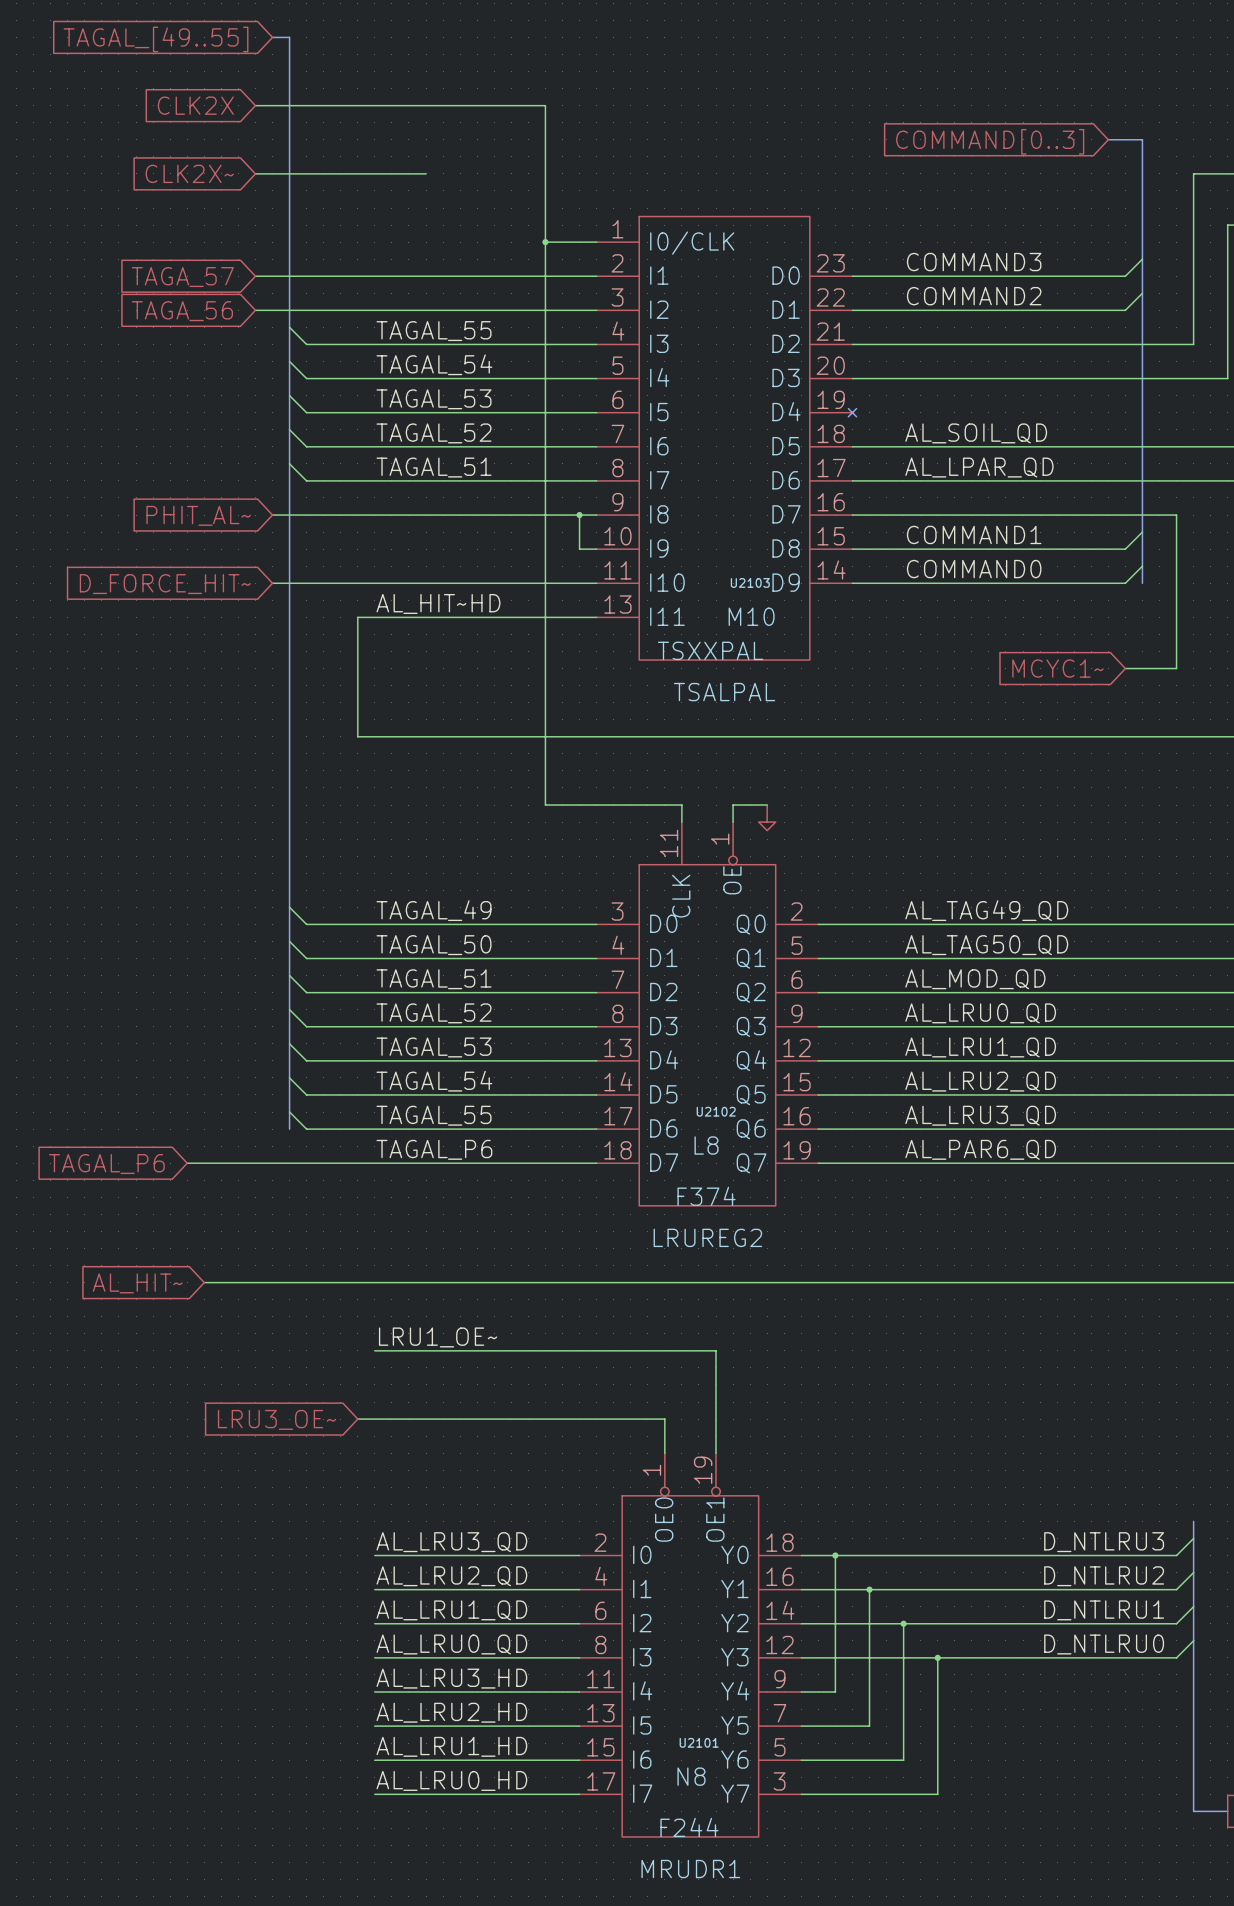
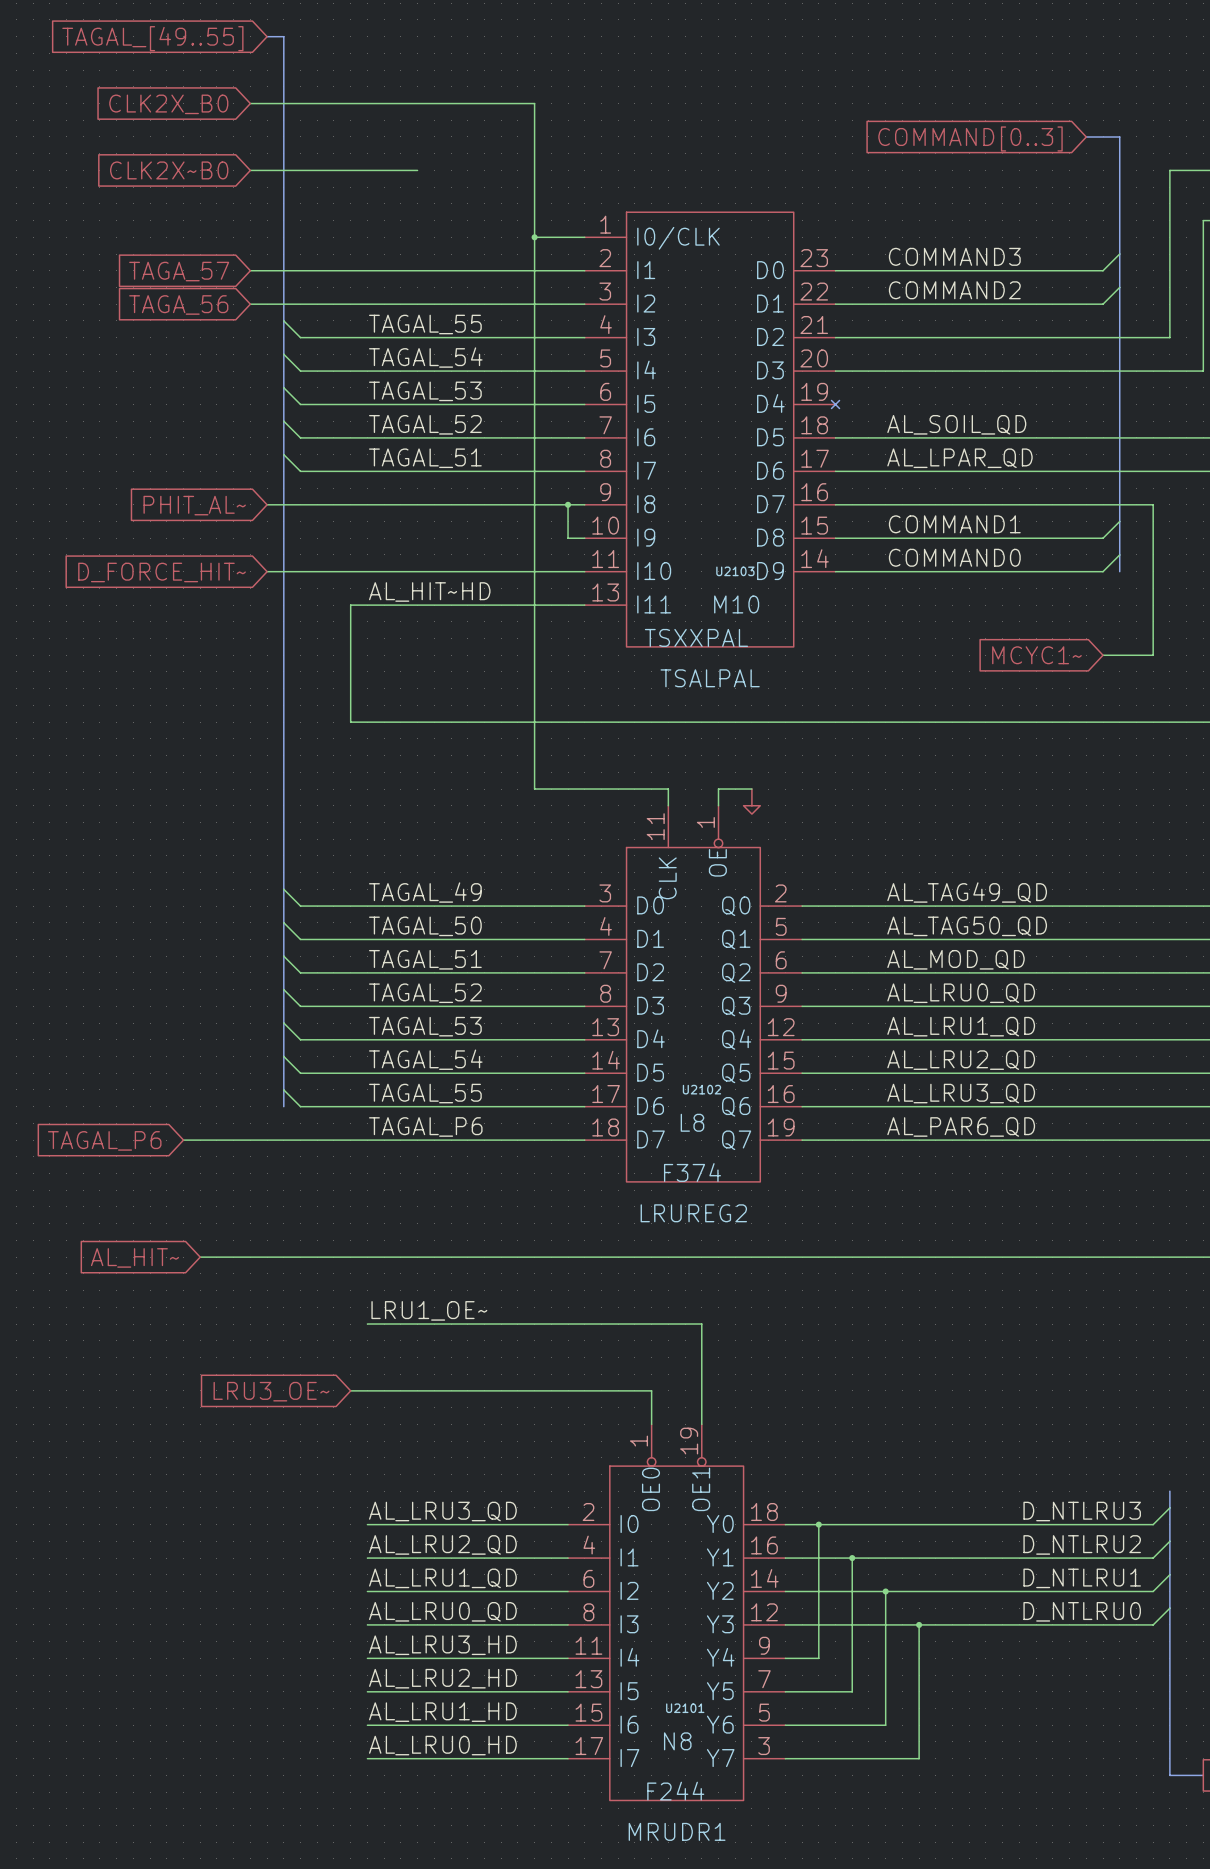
global label: CLK2X (195, 105) -> CLK2X_B0 (168, 104)
global label: CLK2X~ (189, 173) -> CLK2X~B0 (169, 170)

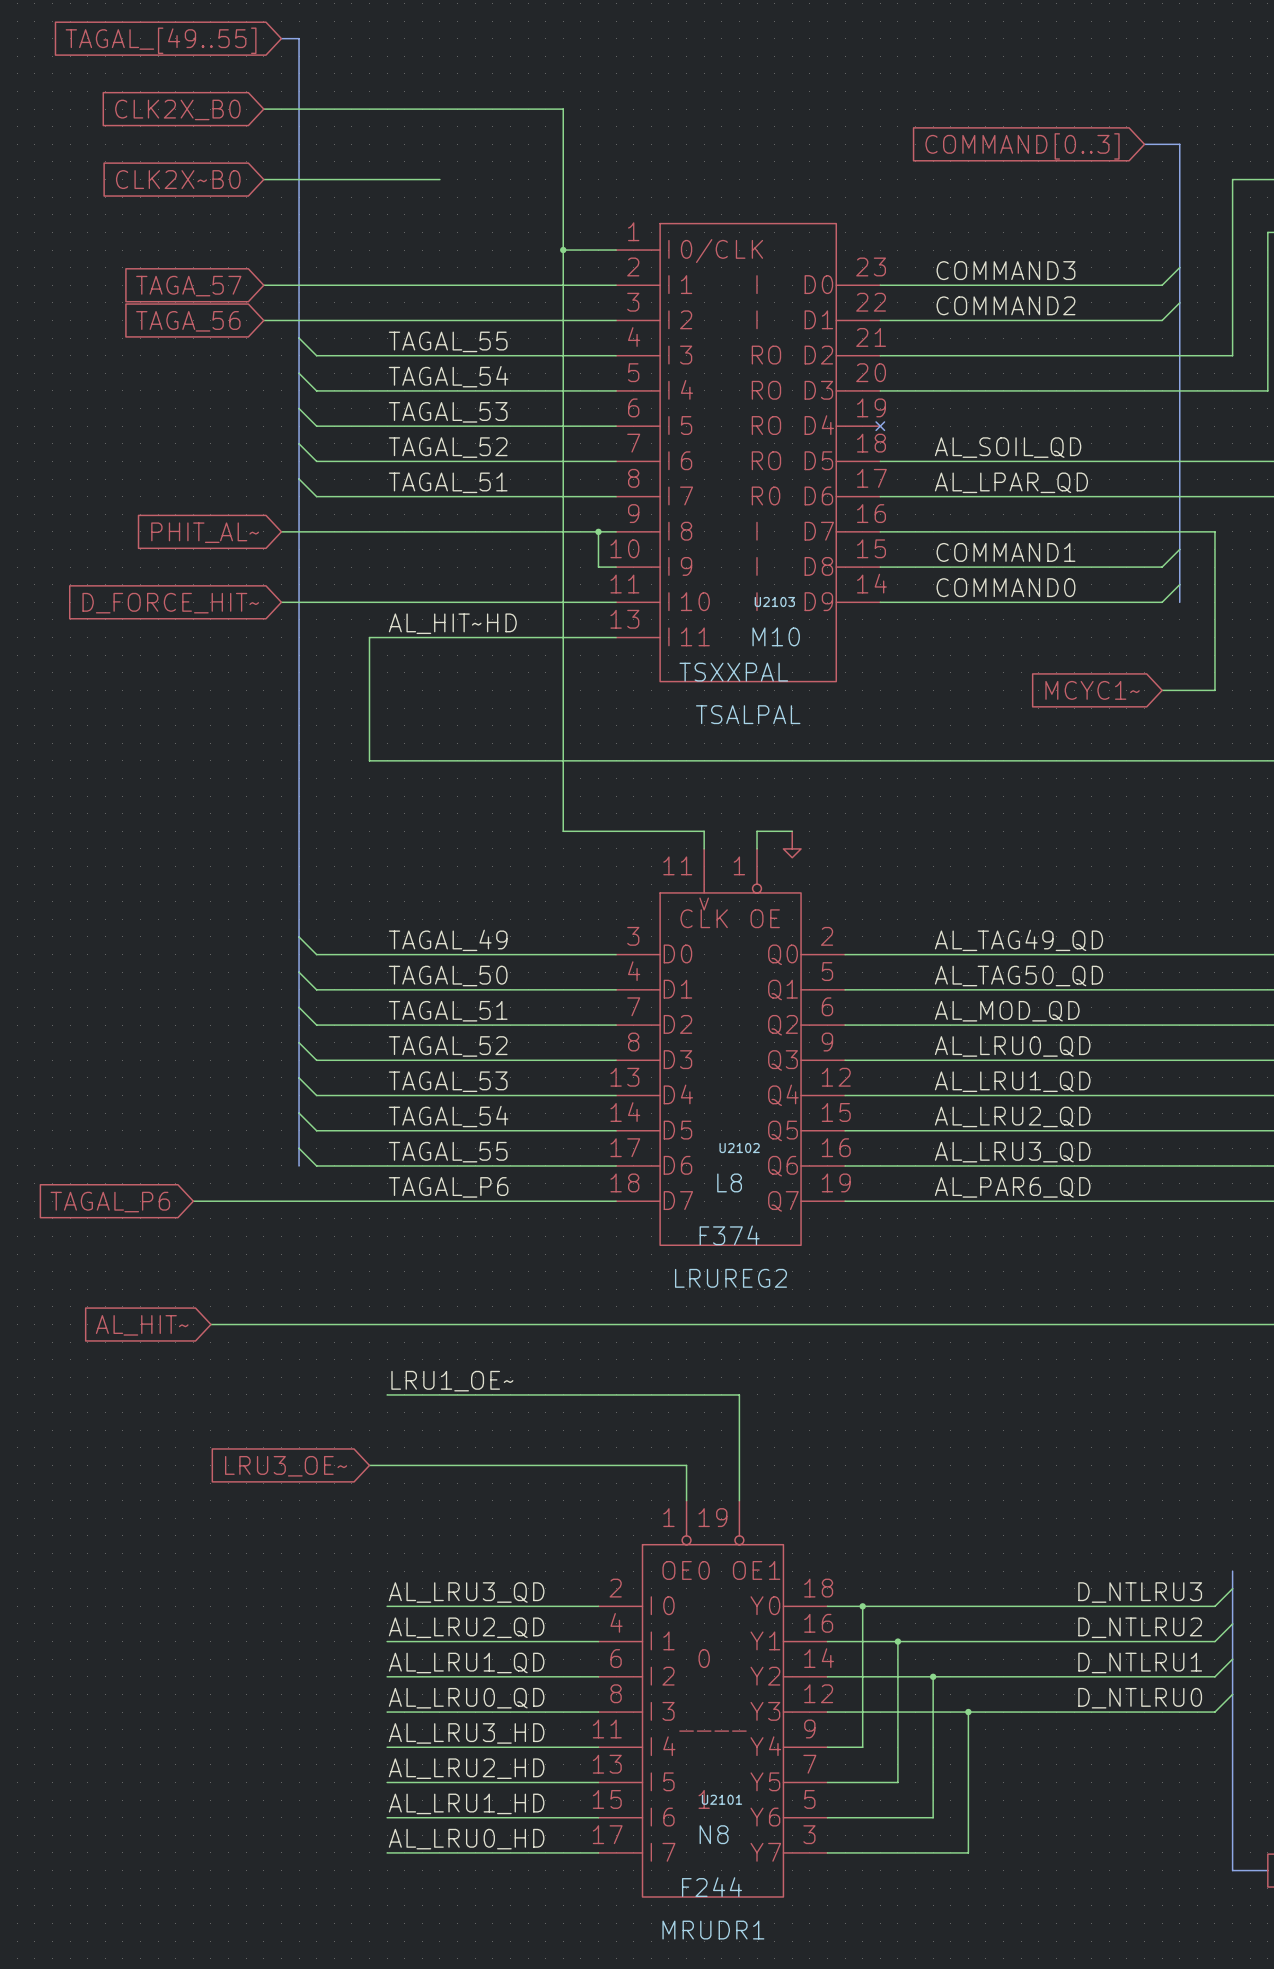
U2103 symbol: [584, 212, 836, 647] -> [616, 223, 881, 682]
U2102 symbol: [584, 805, 803, 1182] -> [616, 848, 846, 1246]
U2101 symbol: [568, 1424, 786, 1801] -> [598, 1500, 828, 1897]

